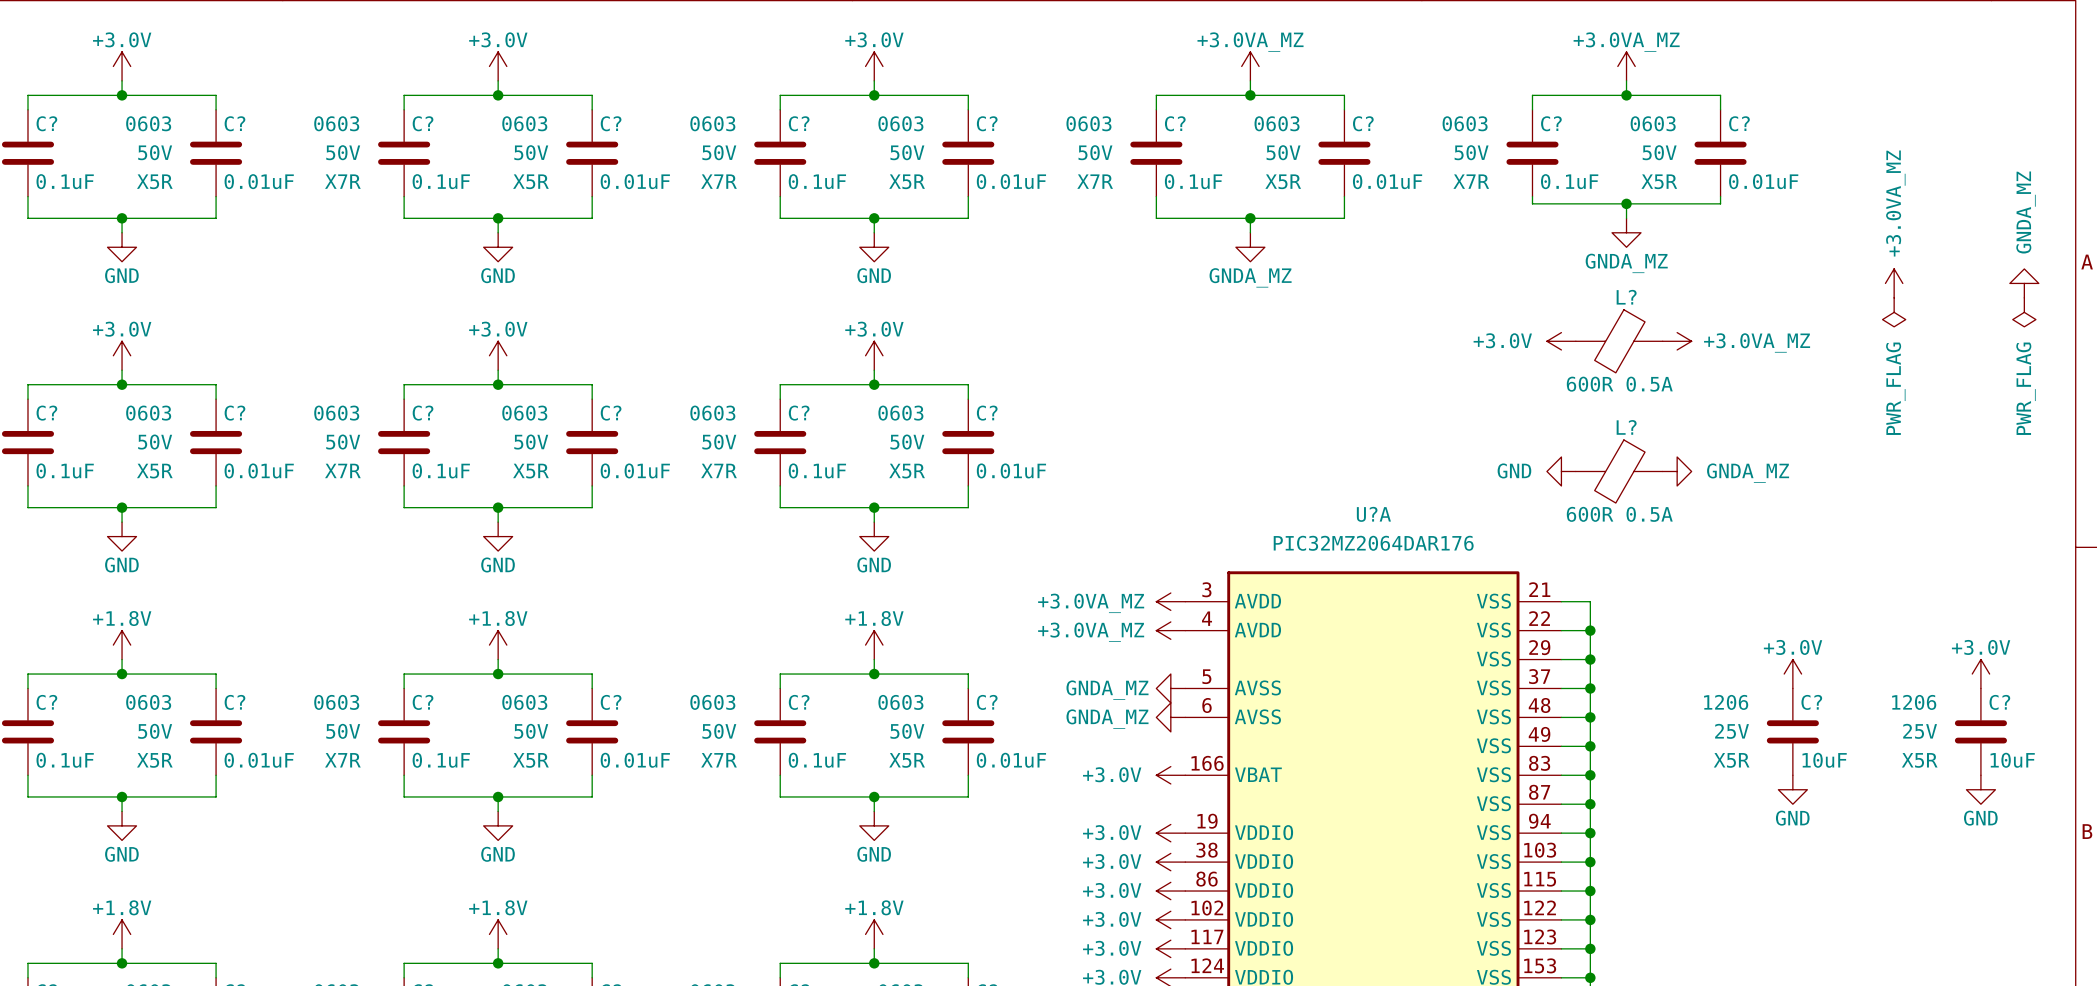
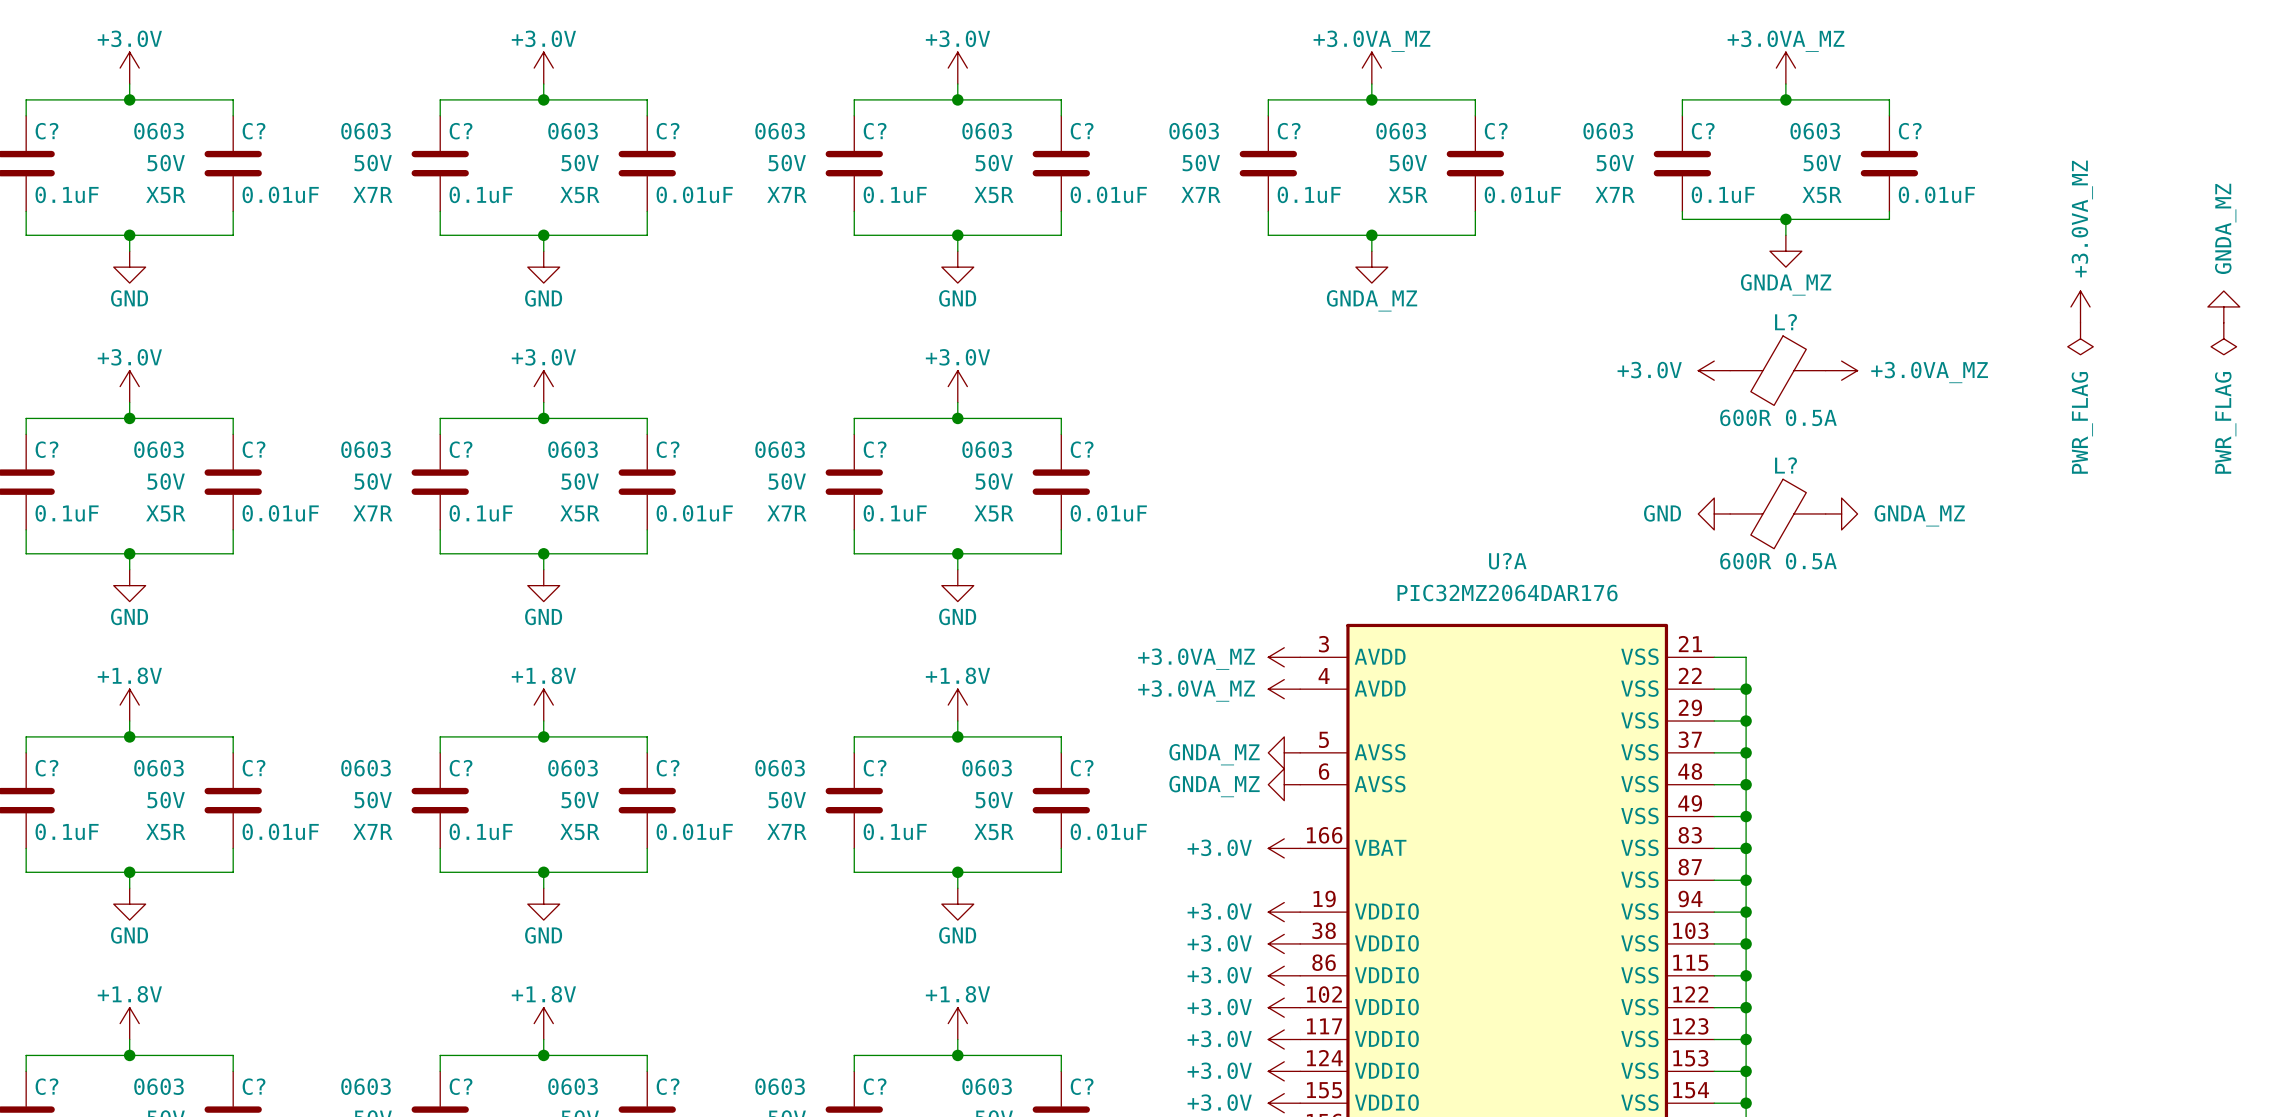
power symbol: +3.0V (1792, 674) -> none
power symbol: +3.0V (1980, 674) -> none
C?: 10uF (1792, 731) -> none
C?: 10uF (1980, 731) -> none
power symbol: GND (1792, 789) -> none
power symbol: GND (1980, 789) -> none

